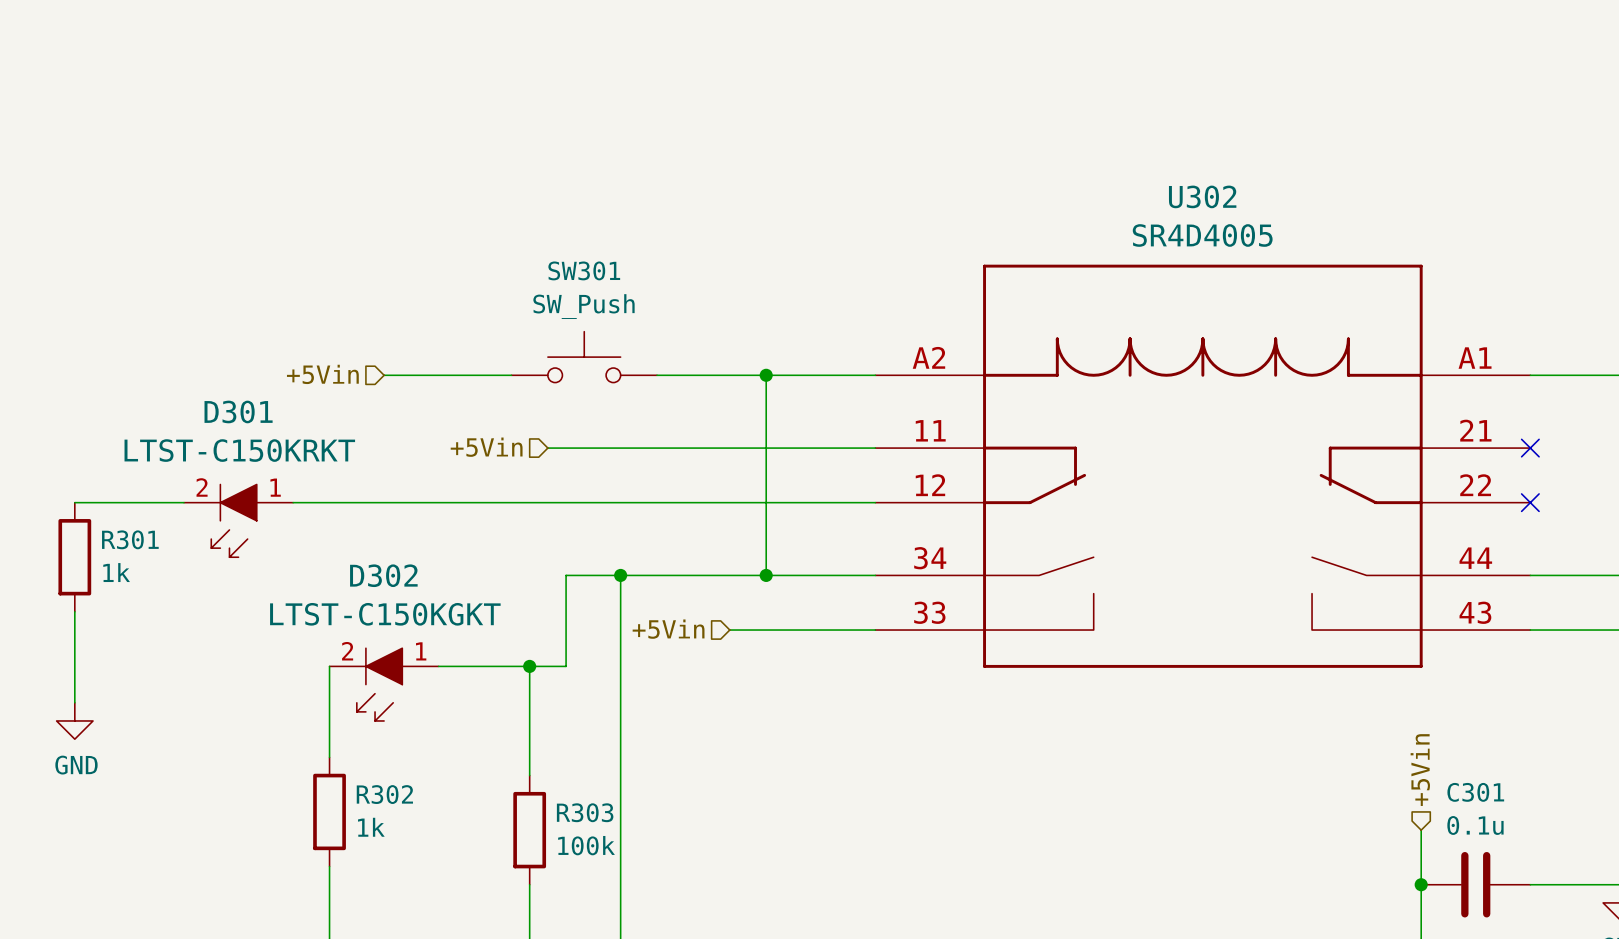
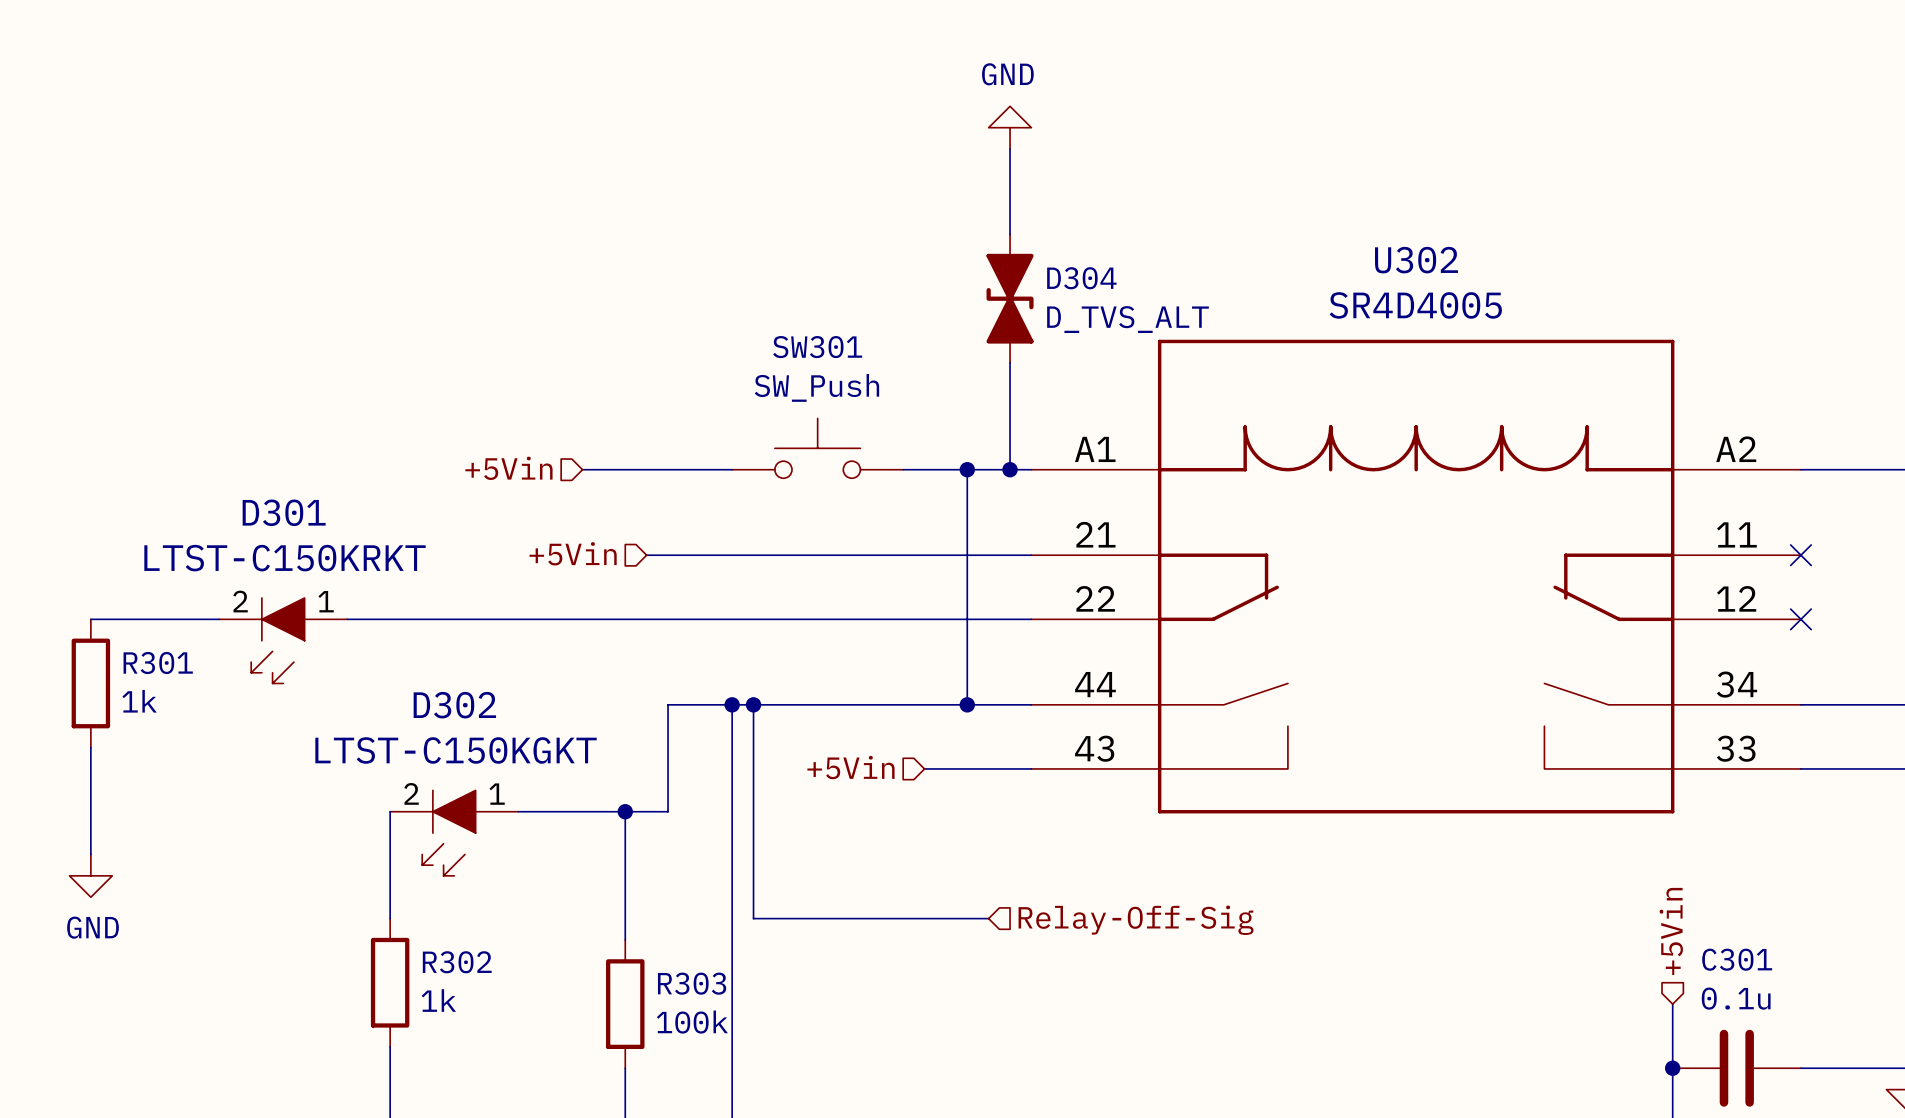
power symbol: none -> GND (1010, 127)
wire: none -> (1010, 149) (1010, 234)
D304: none -> D_TVS_ALT (1010, 298)
wire: none -> (1010, 362) (1010, 469)
SW301 position: (584, 357) -> (817, 448)
hierarchical label position: +5Vin (322, 374) -> +5Vin (508, 468)
wire: (384, 375) (493, 375) -> (603, 469) (732, 469)
wire: (657, 375) (766, 375) (766, 575) -> none
junction: (766, 375) -> none
wire: none -> (967, 469) (967, 704)
junction: none -> (967, 469)
junction: none -> (1010, 469)
U302 flip: as is (1202, 466) -> left-right (1416, 576)
wire: none -> (753, 704) (753, 918) (988, 918)
junction: none -> (753, 704)
junction position: (766, 575) -> (967, 704)
hierarchical label position: +5Vin (668, 629) -> +5Vin (850, 767)
wire: (729, 630) (784, 630) -> none
hierarchical label: none -> Relay-Off-Sig (1136, 920)

